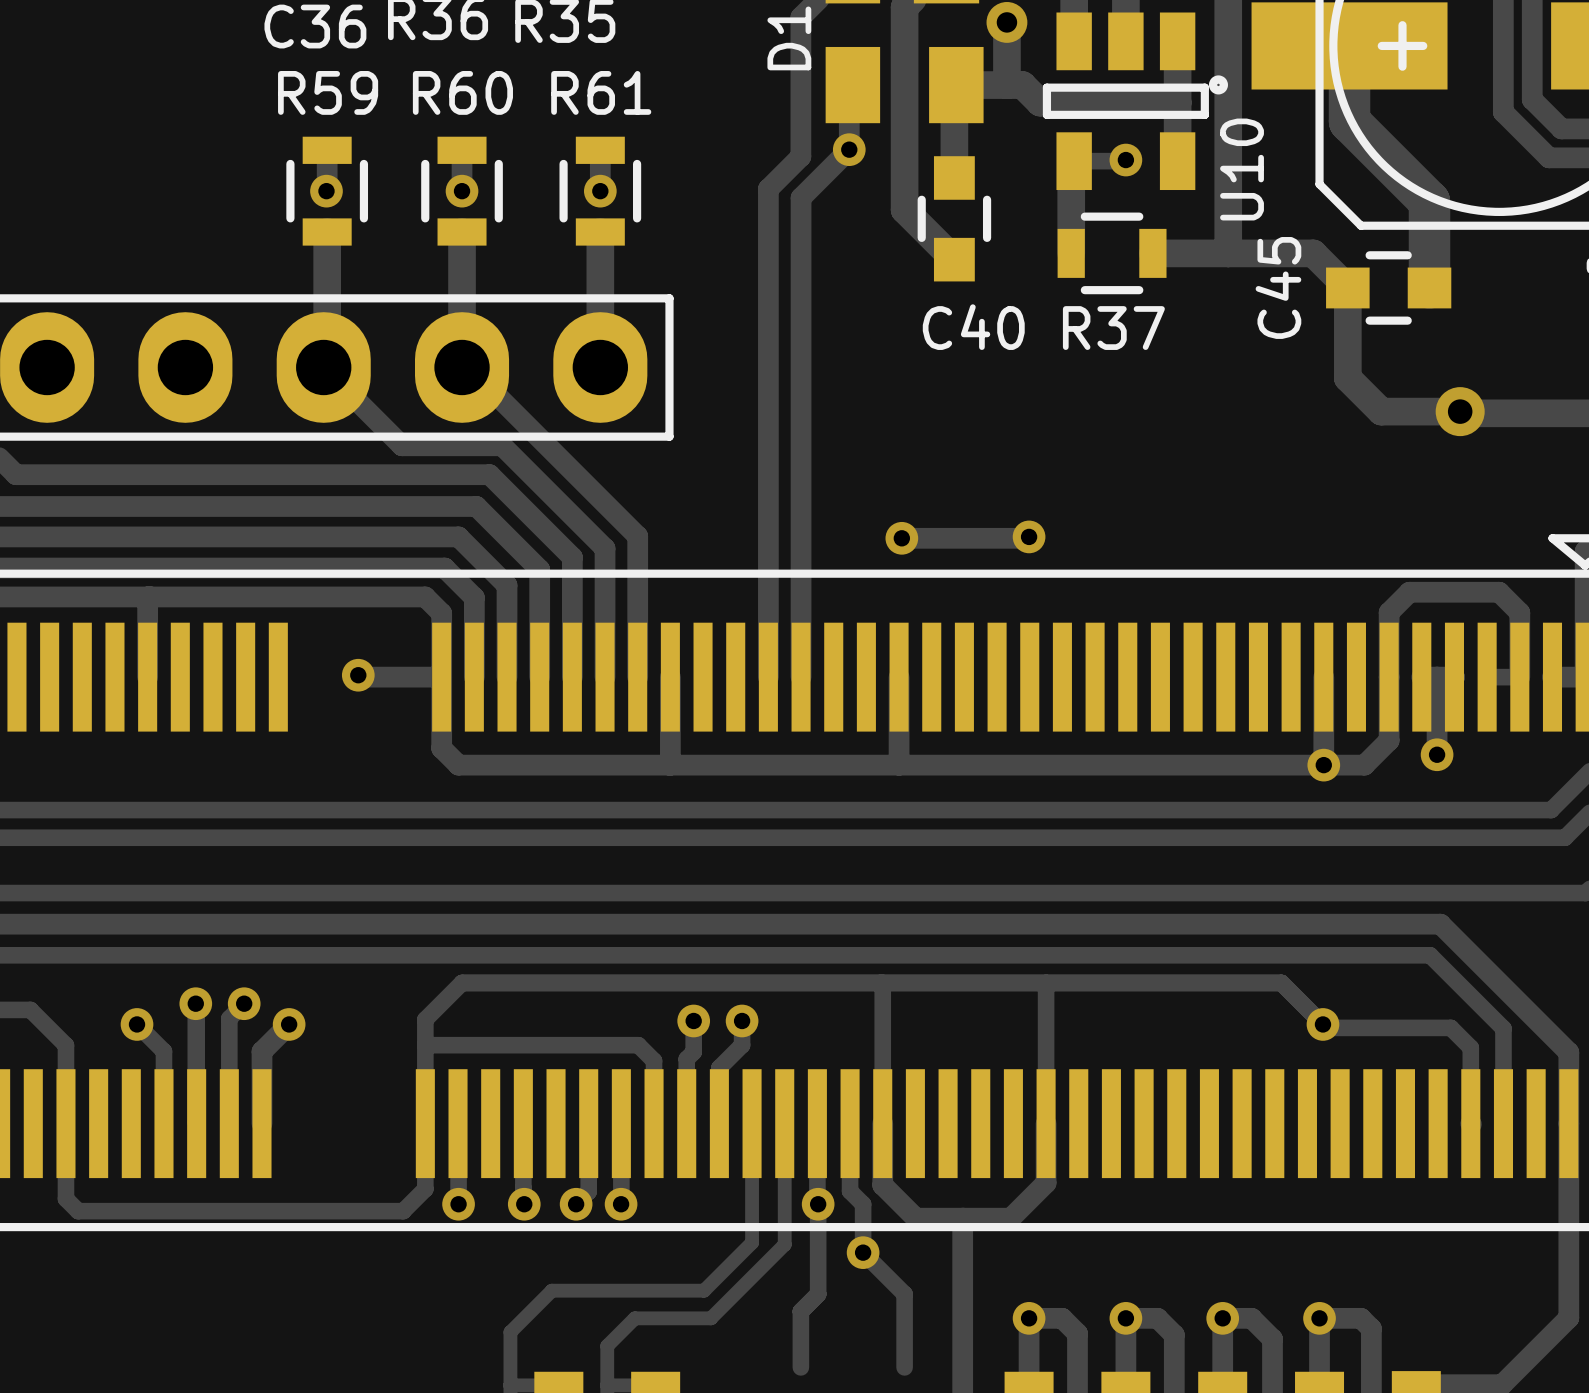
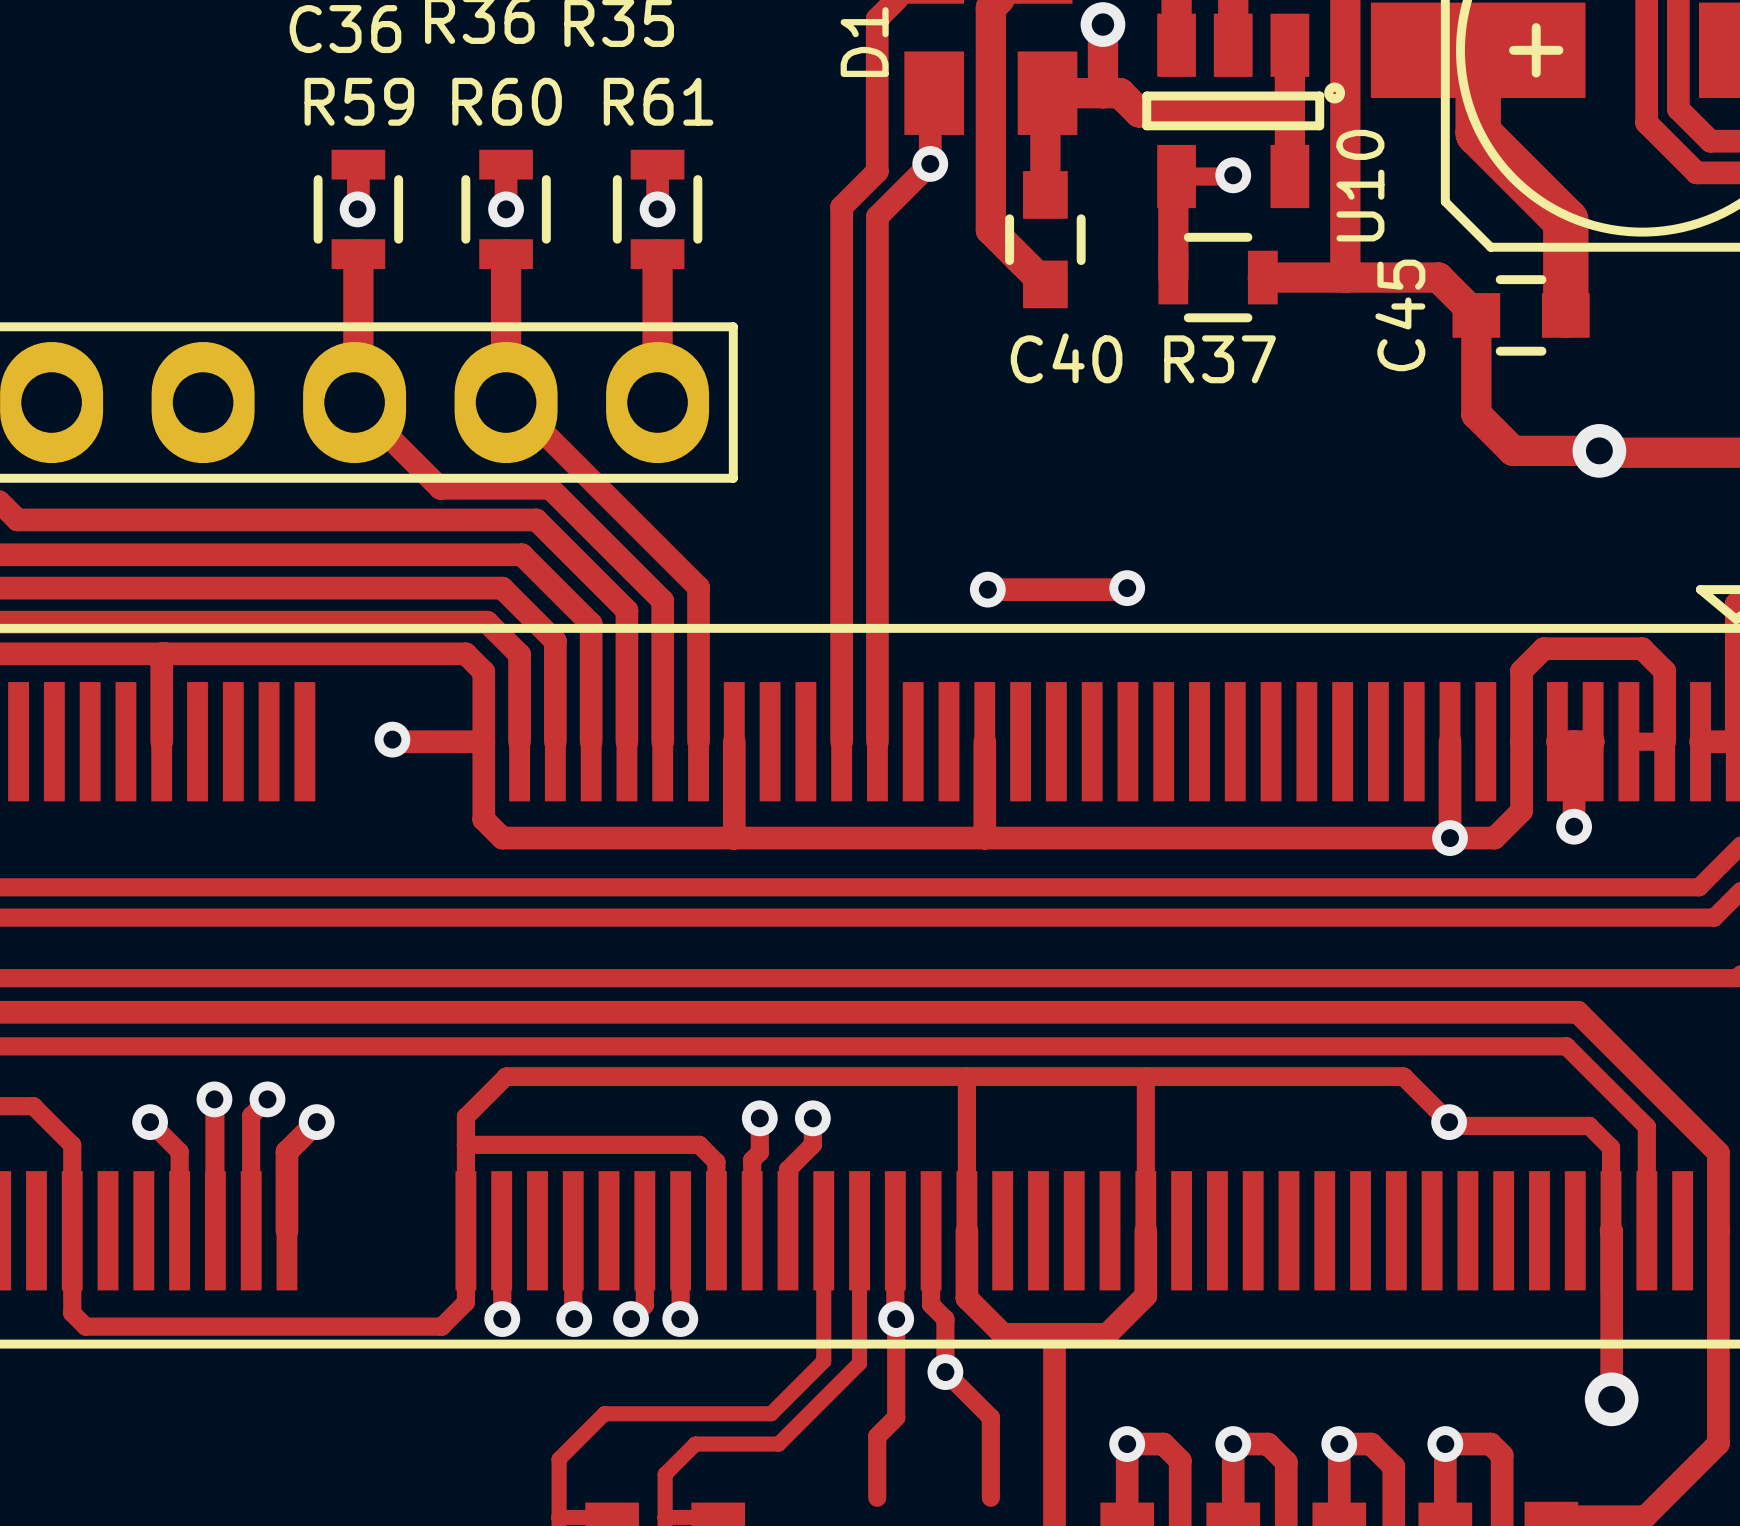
track: none -> (1611, 1231) (1611, 1399)
via: none -> (1611, 1399)

